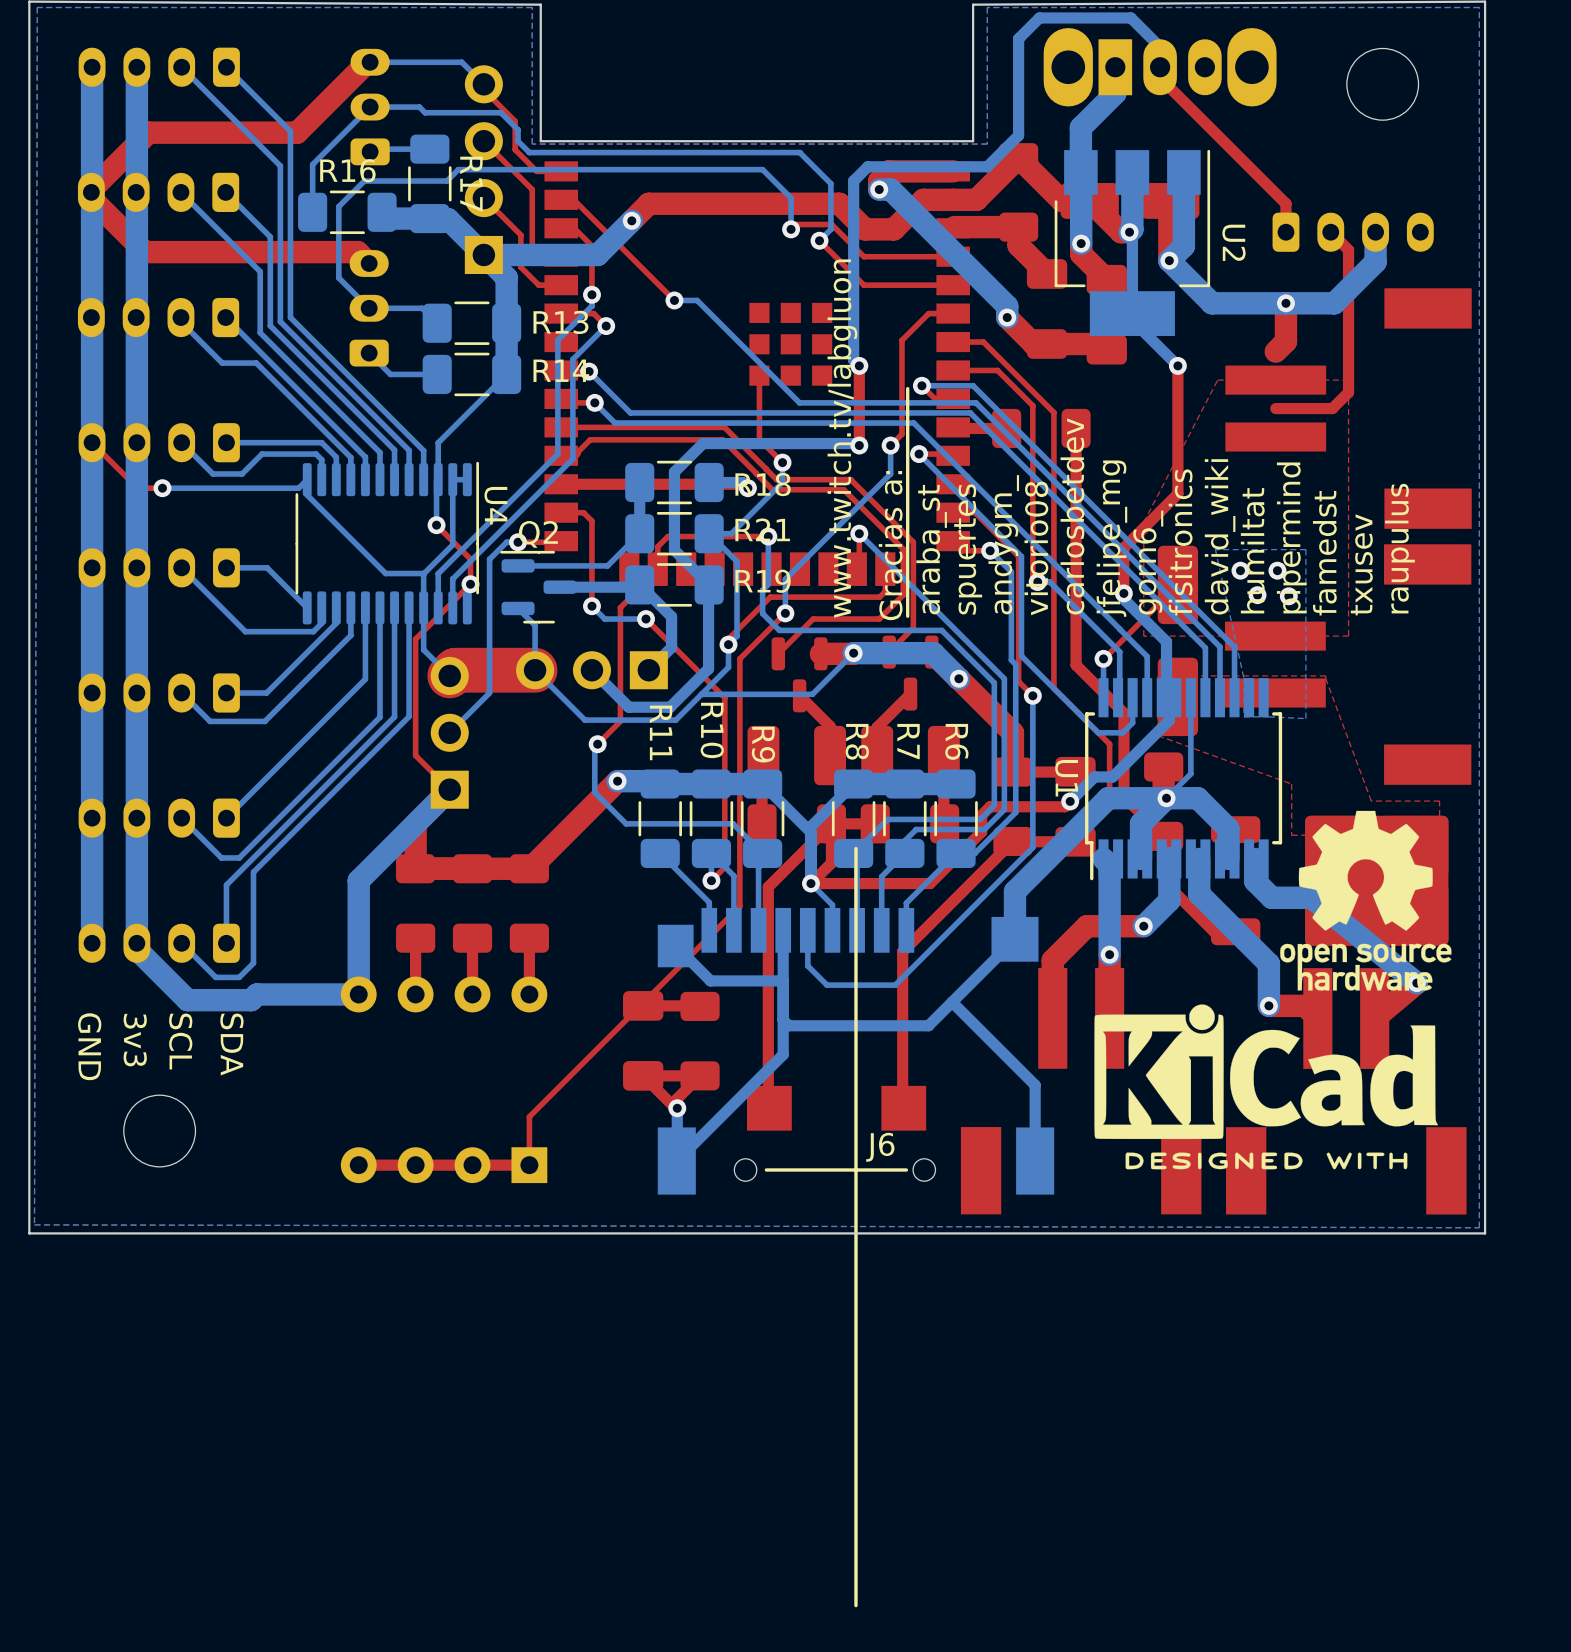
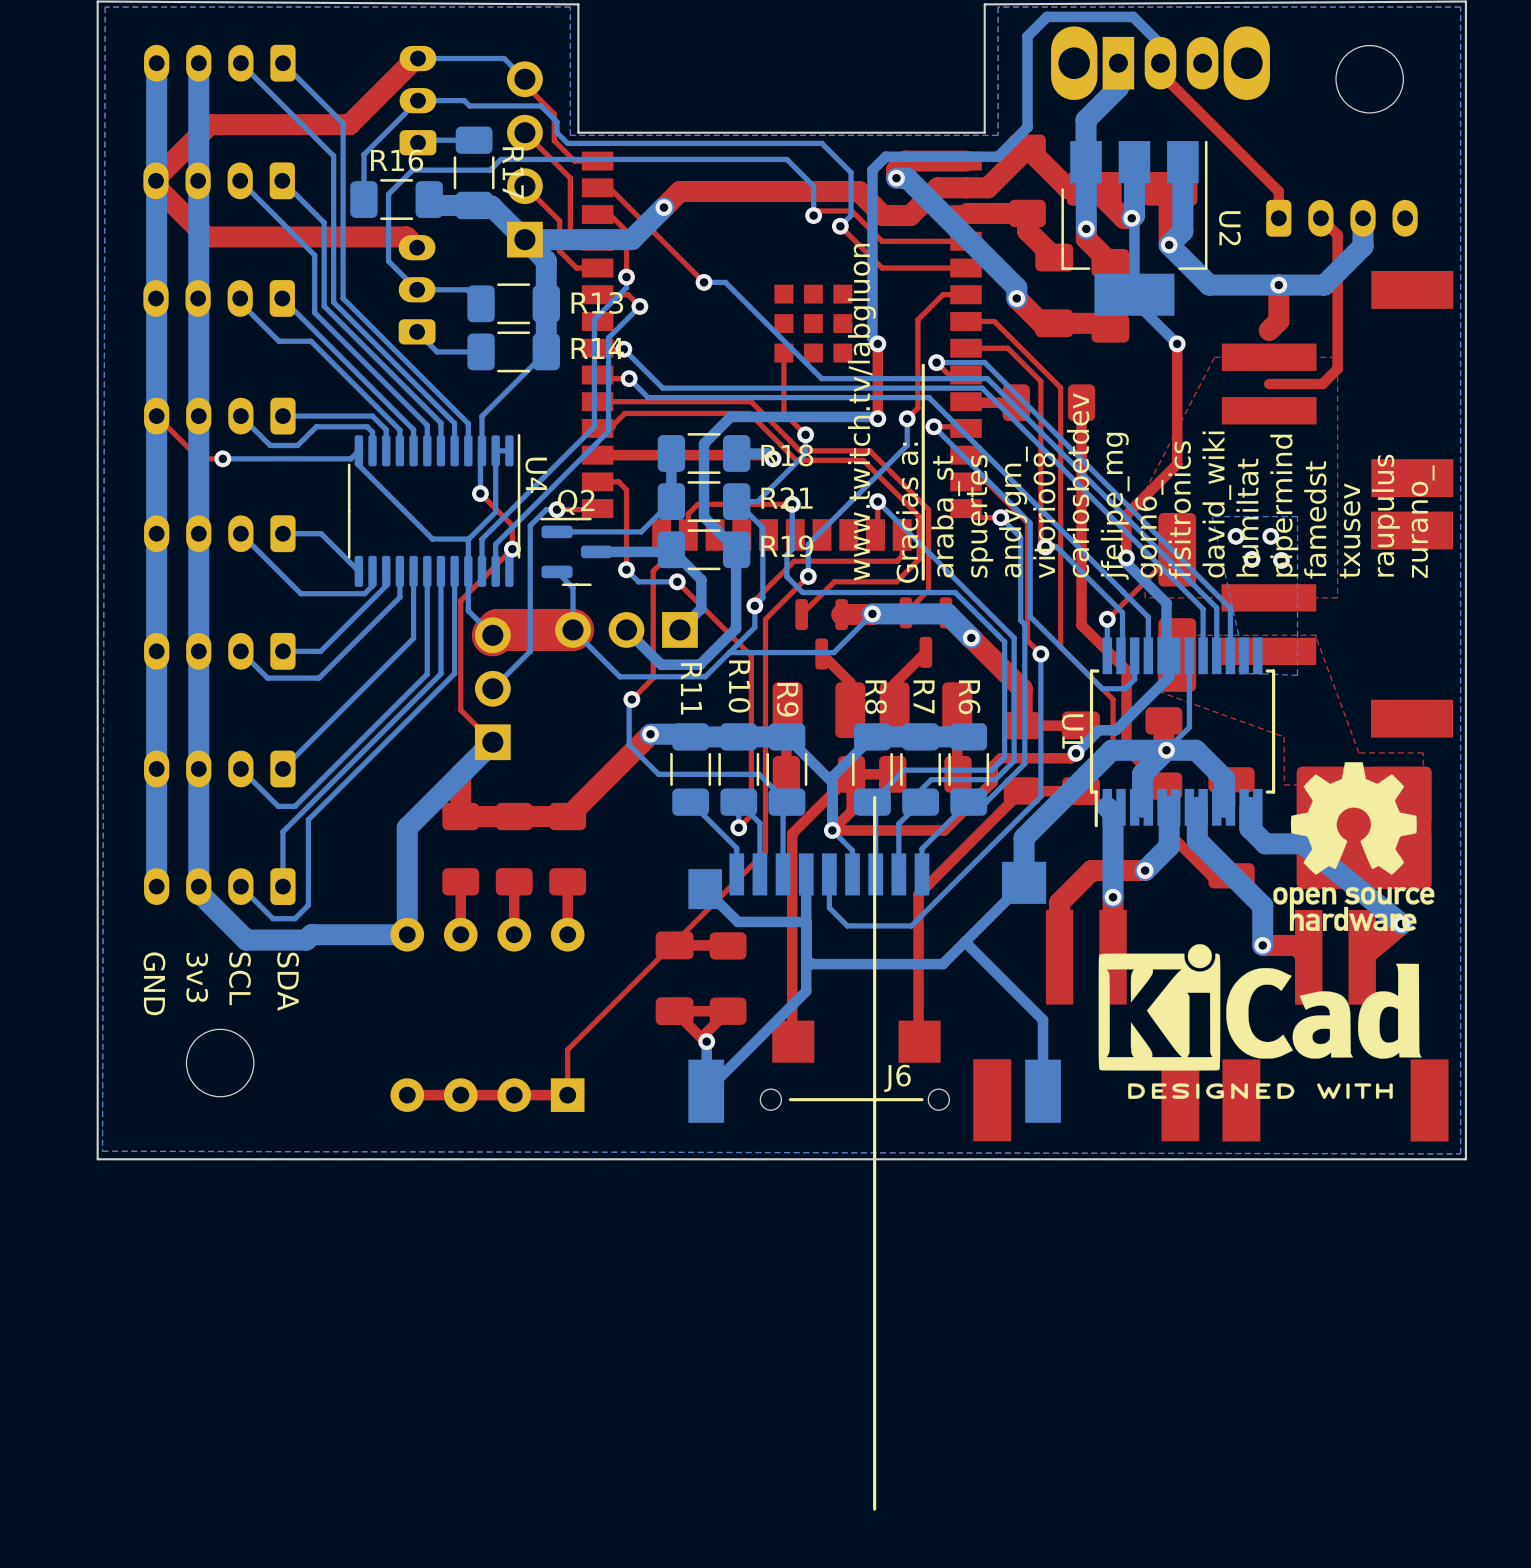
text: none -> zurano_ (1423, 521)

